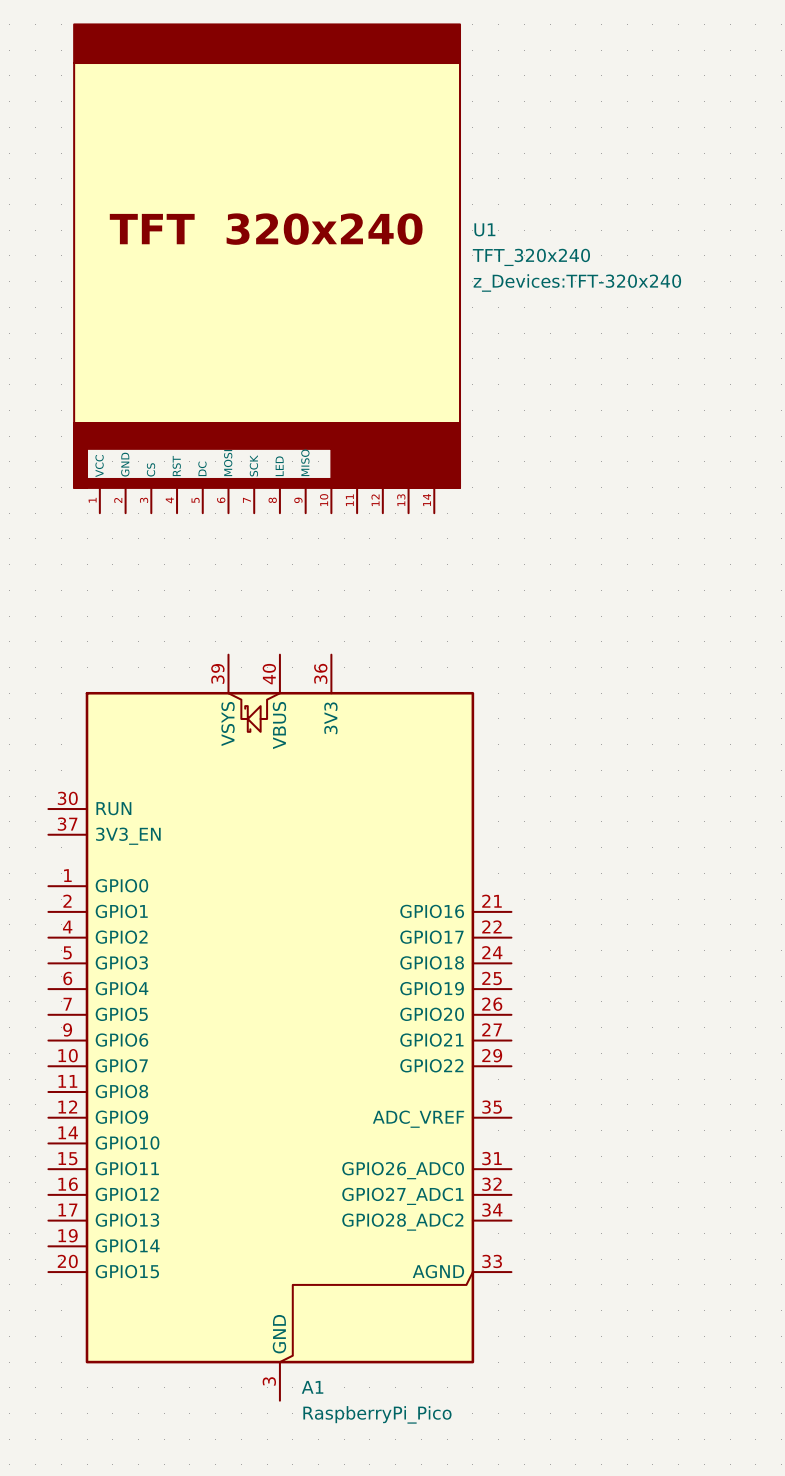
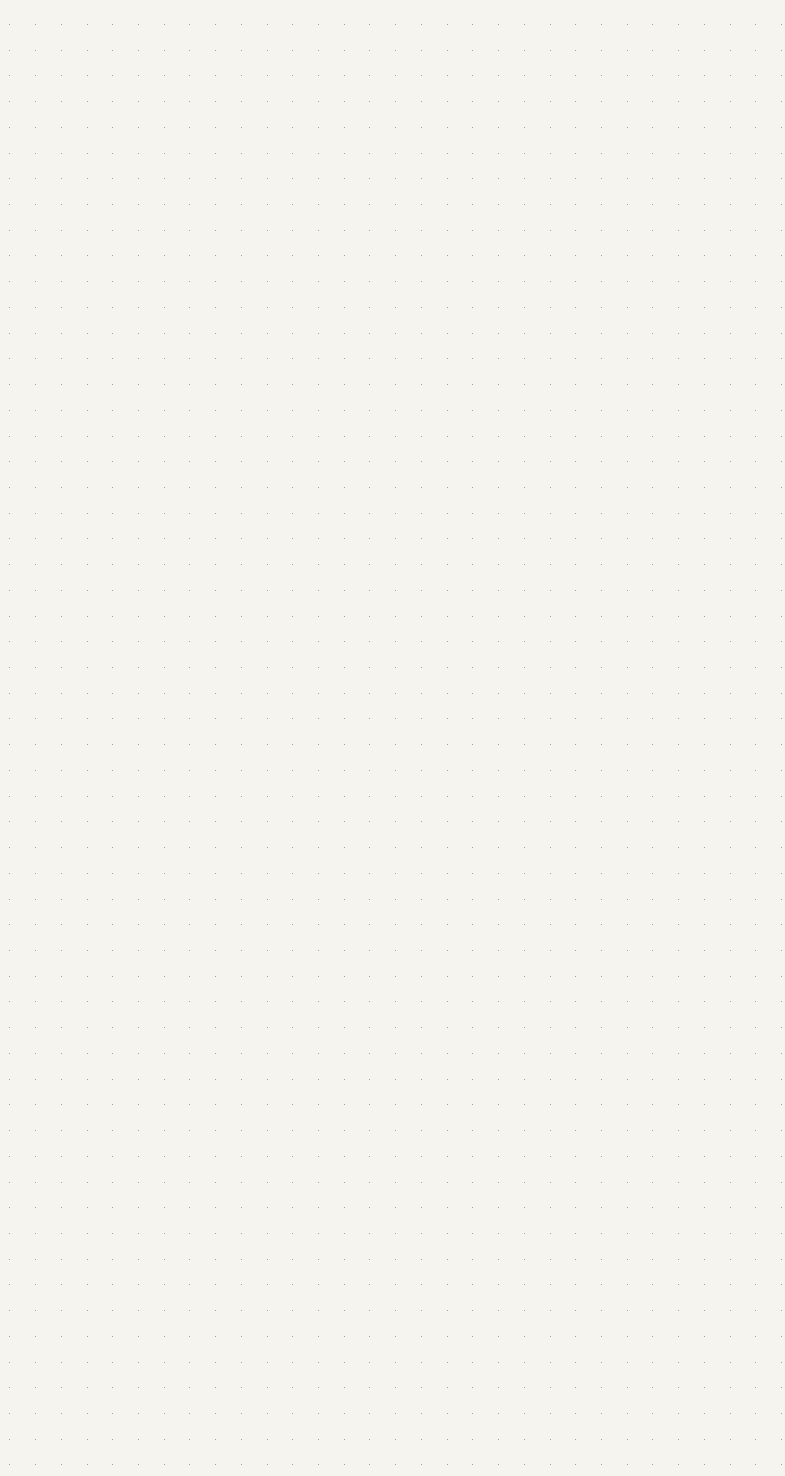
U1: TFT_320x240 (267, 268) -> none
A1: RaspberryPi_Pico (279, 1027) -> none

